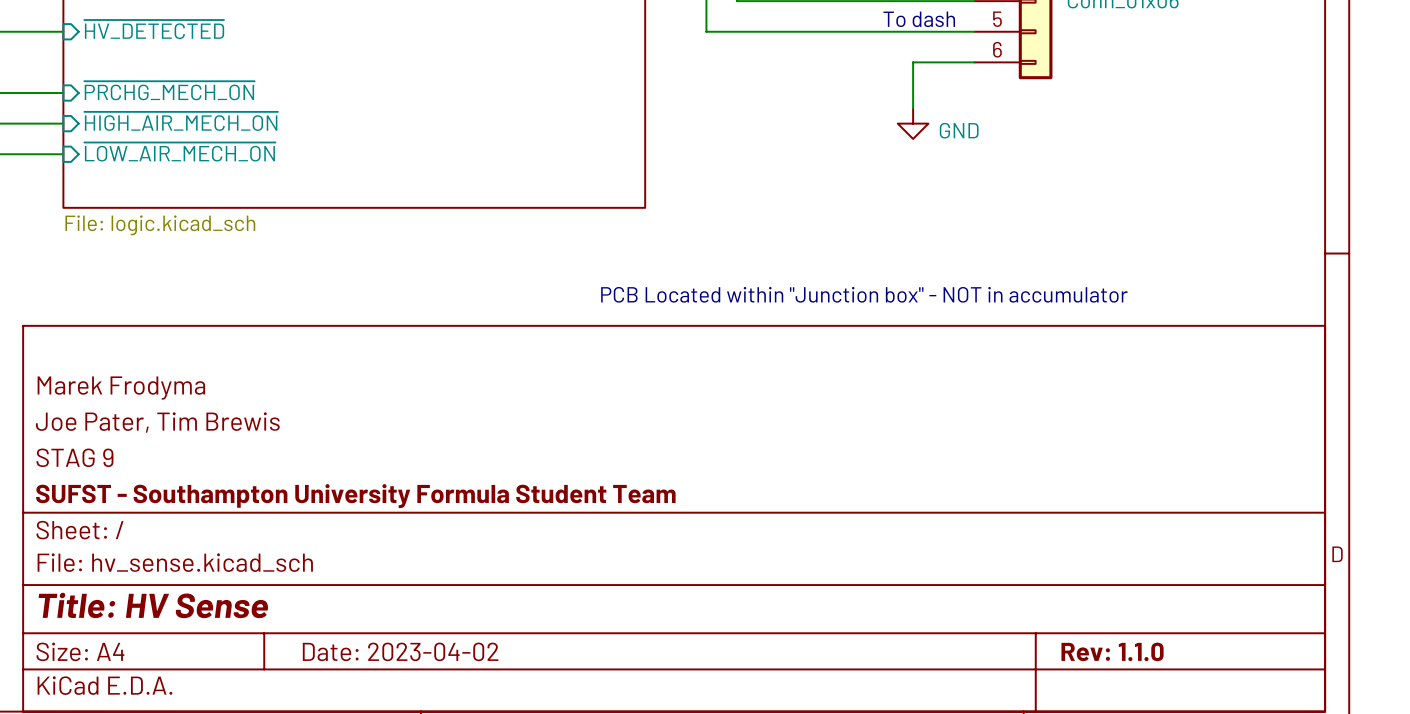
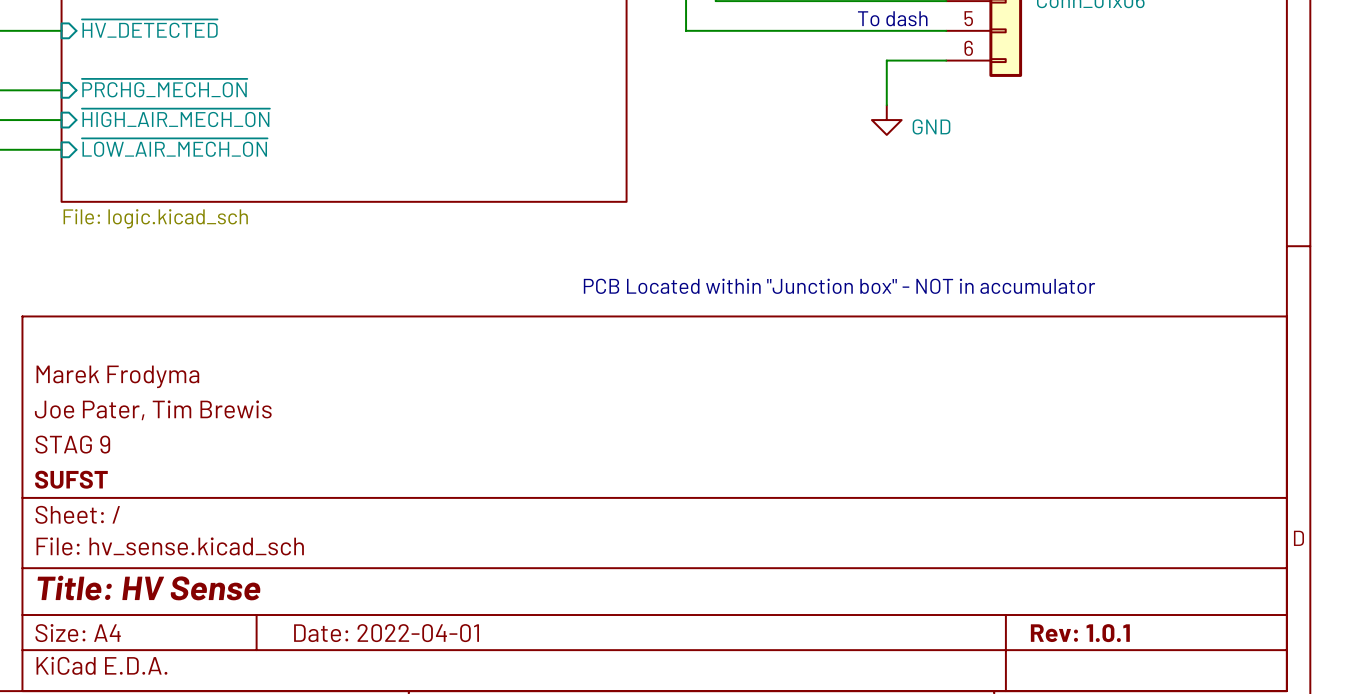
title block: SUFST - Southampton University Formula Student Team (355, 496) -> SUFST (71, 479)
title block: Date: 2023-04-02 (400, 651) -> Date: 2022-04-01 (386, 633)
title block: Rev: 1.1.0 (1112, 651) -> Rev: 1.0.1 (1080, 633)

